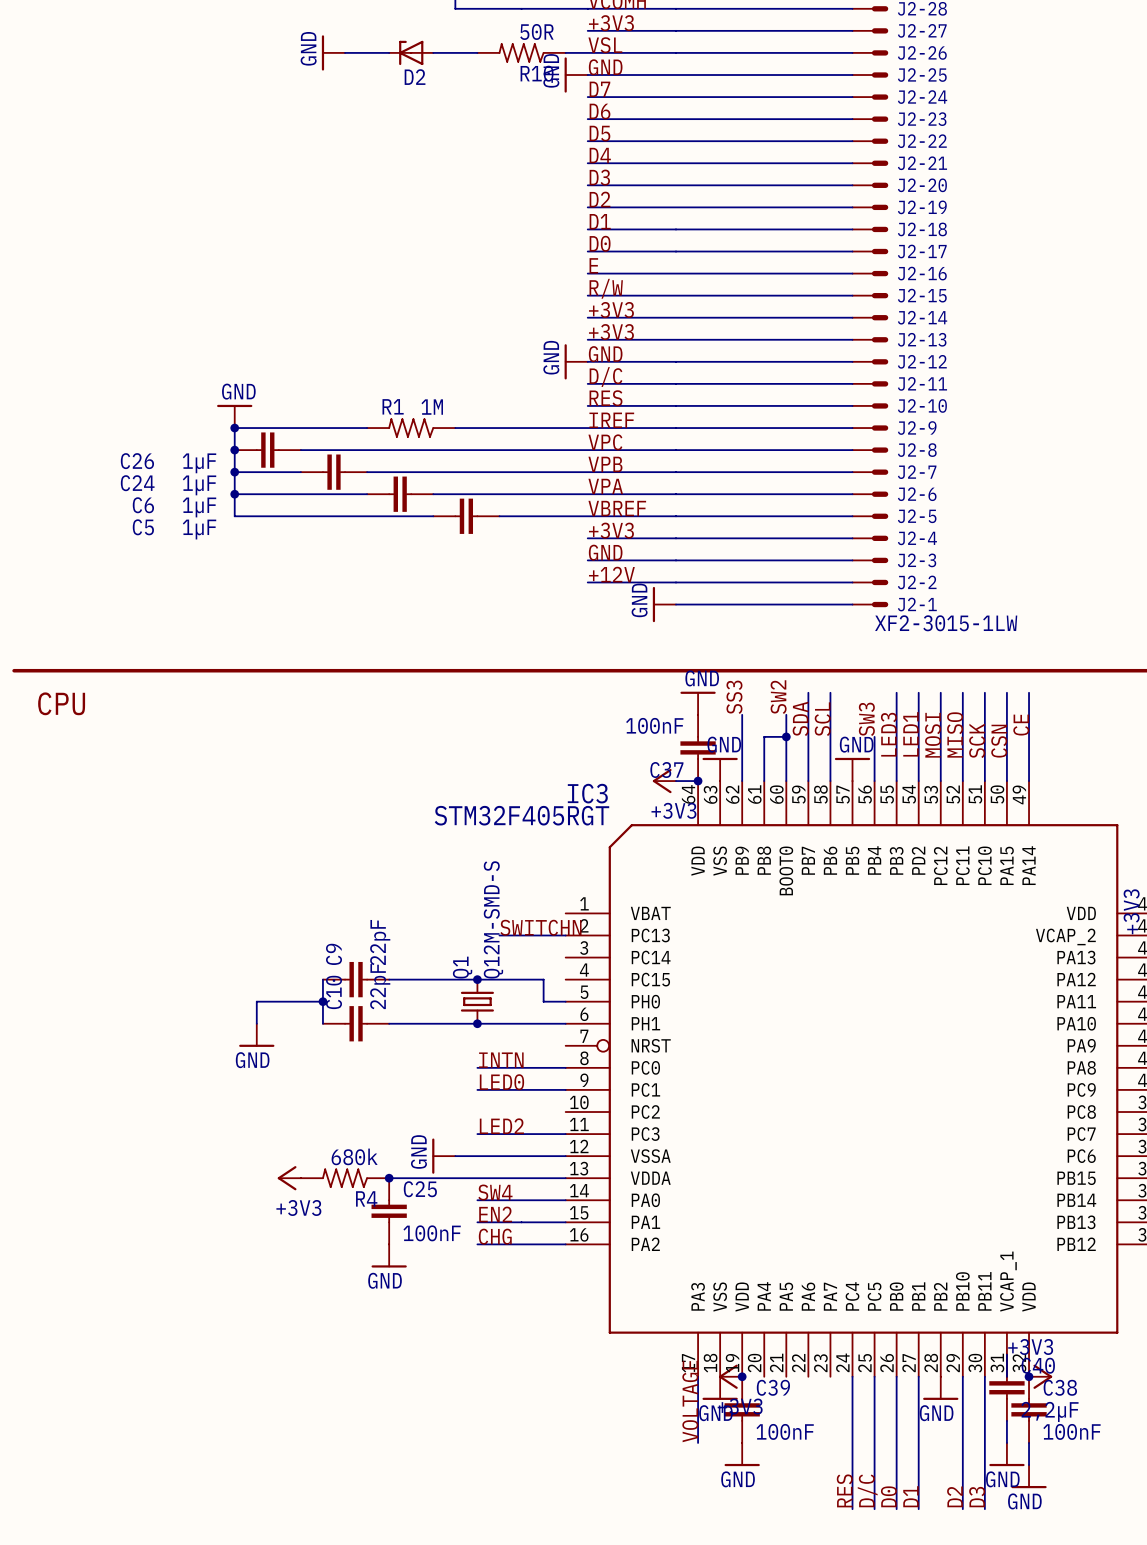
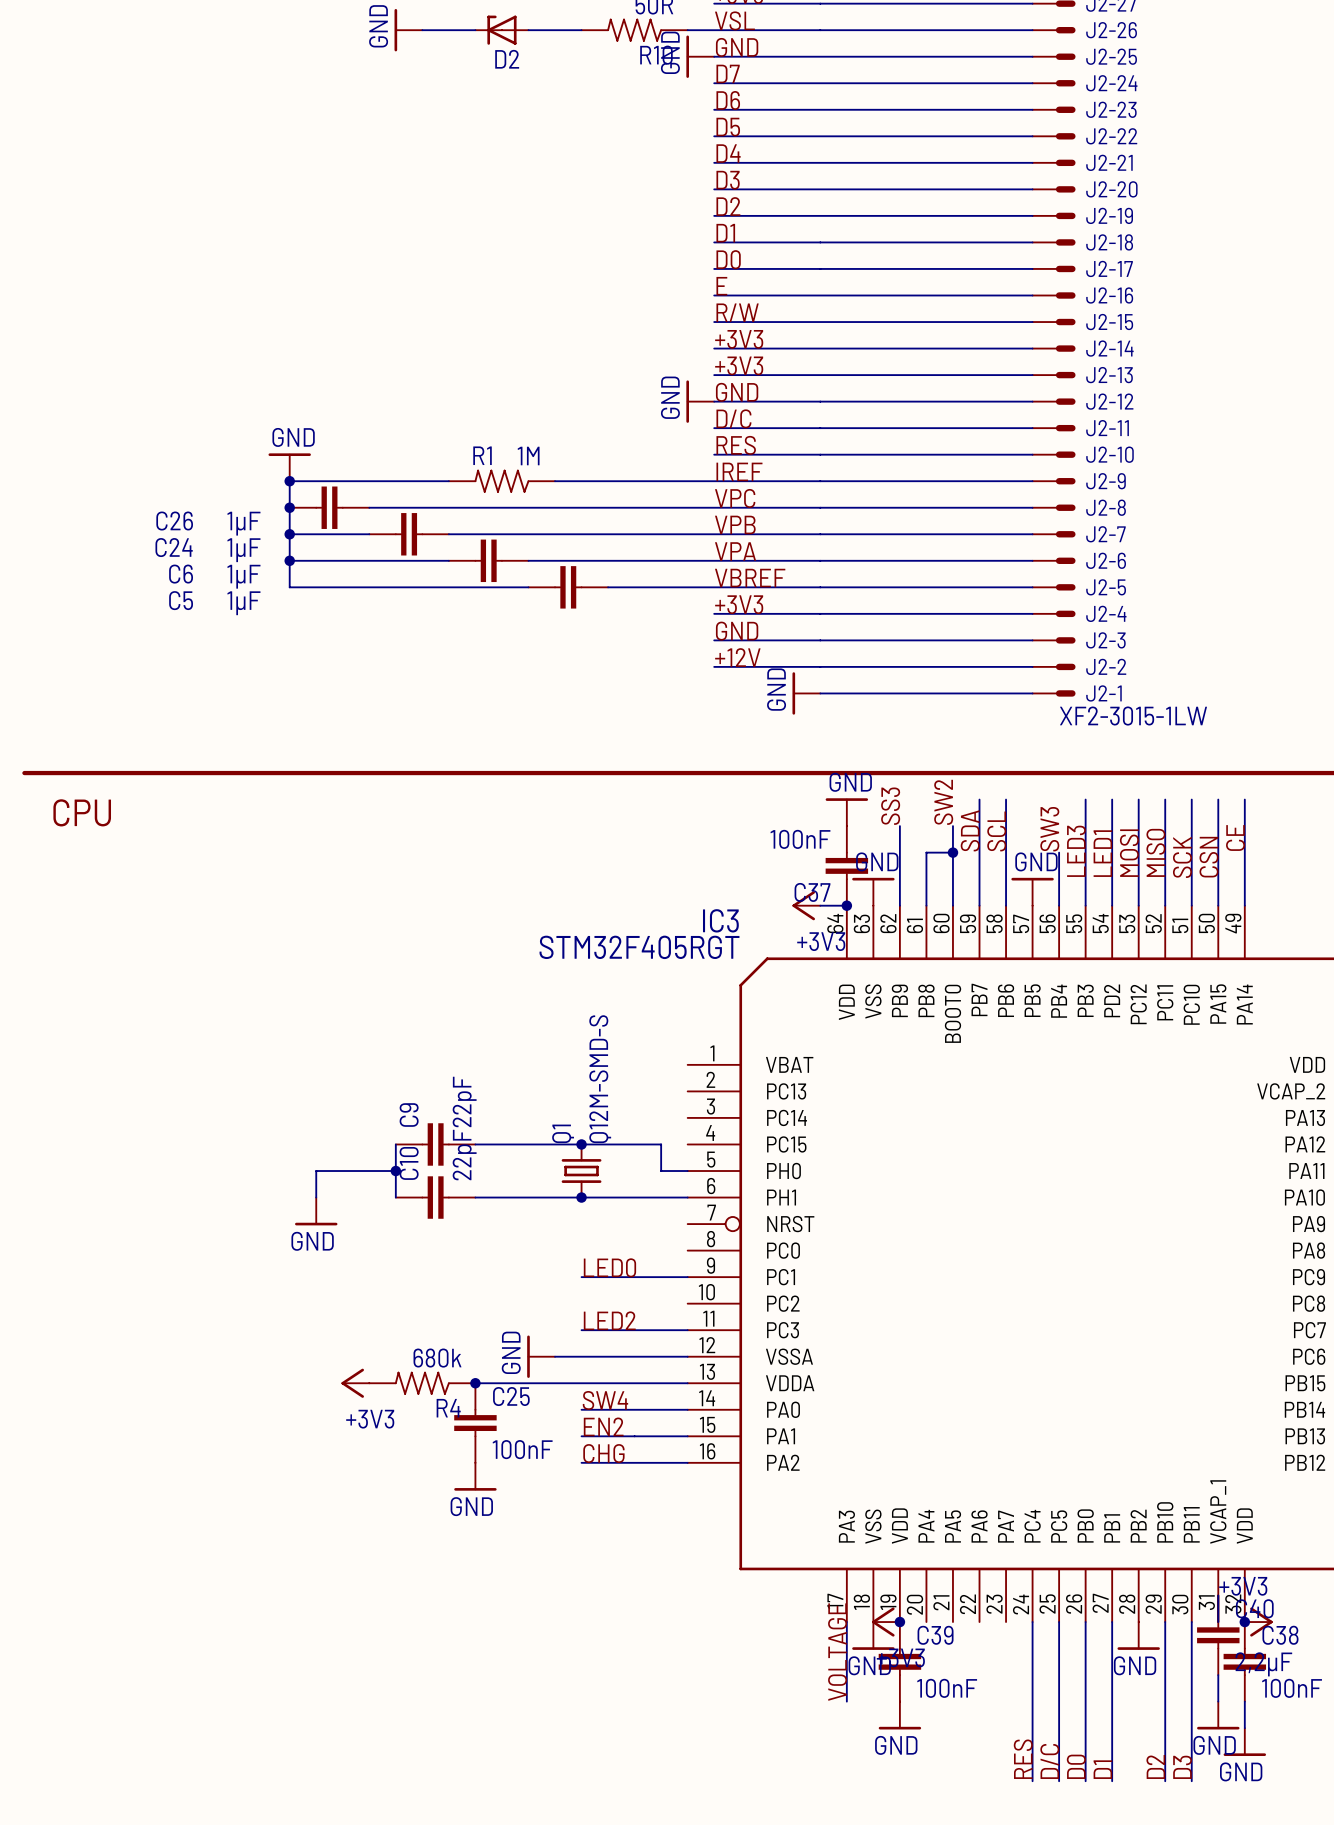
label: SWITCHN (540, 927) -> none
wire: (499, 935) (565, 935) -> none
label: INTN (501, 1060) -> none
wire: (477, 1067) (565, 1067) -> none

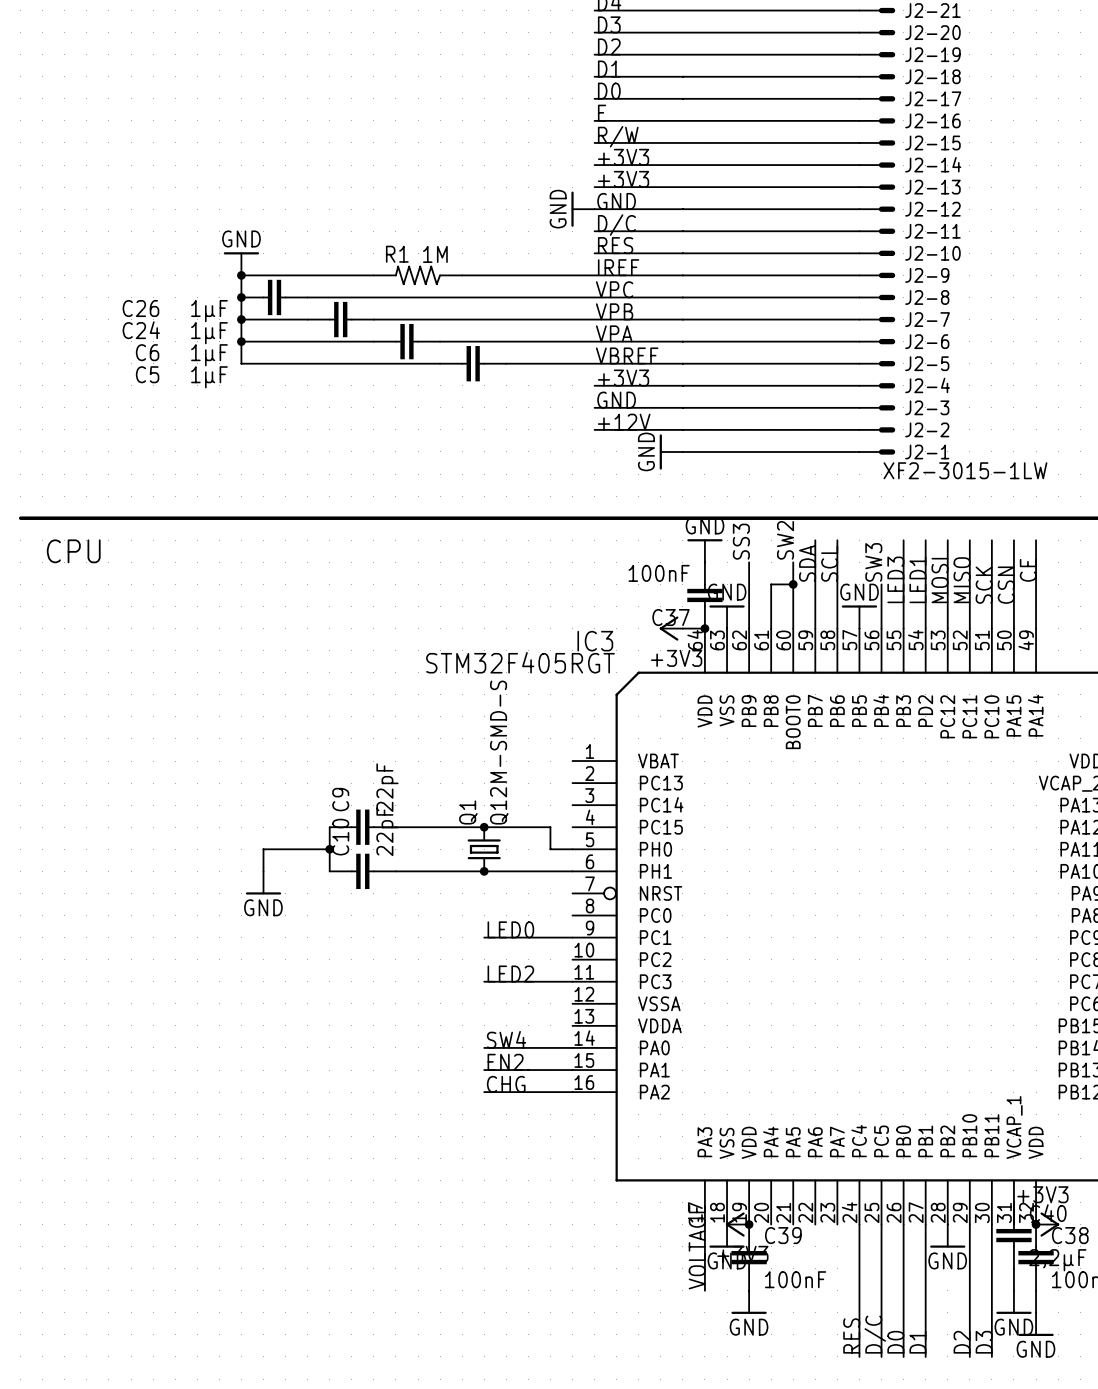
power symbol: GND (541, 1356) -> none
wire: (555, 1356) (687, 1356) -> none
power symbol: +3V3 (355, 1383) -> none
R4: 680k (422, 1383) -> none
wire: (475, 1383) (687, 1383) -> none
junction: (475, 1383) -> none
C25: 100nF (475, 1423) -> none
power symbol: GND (475, 1476) -> none

